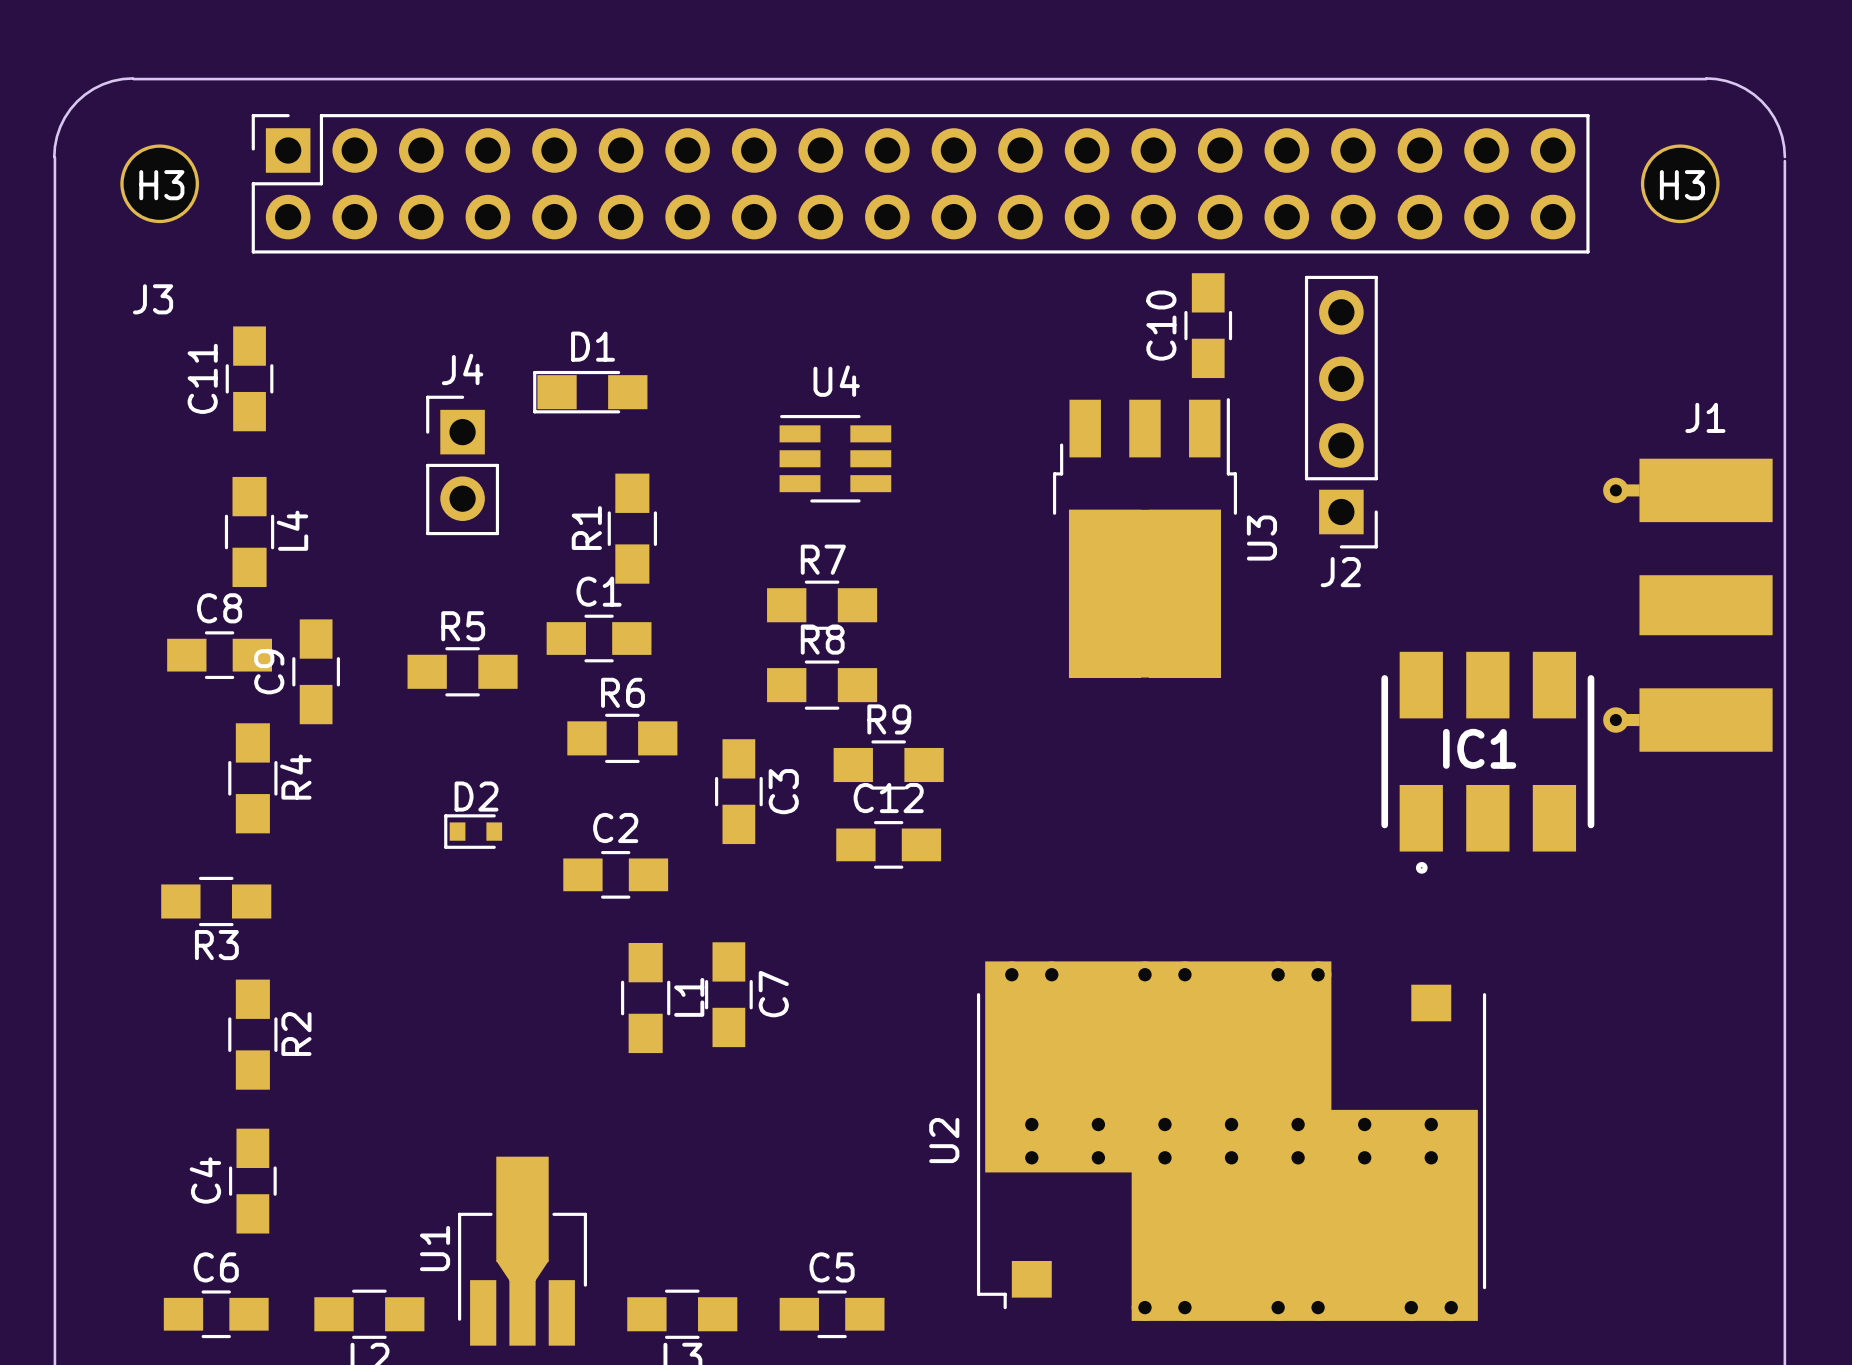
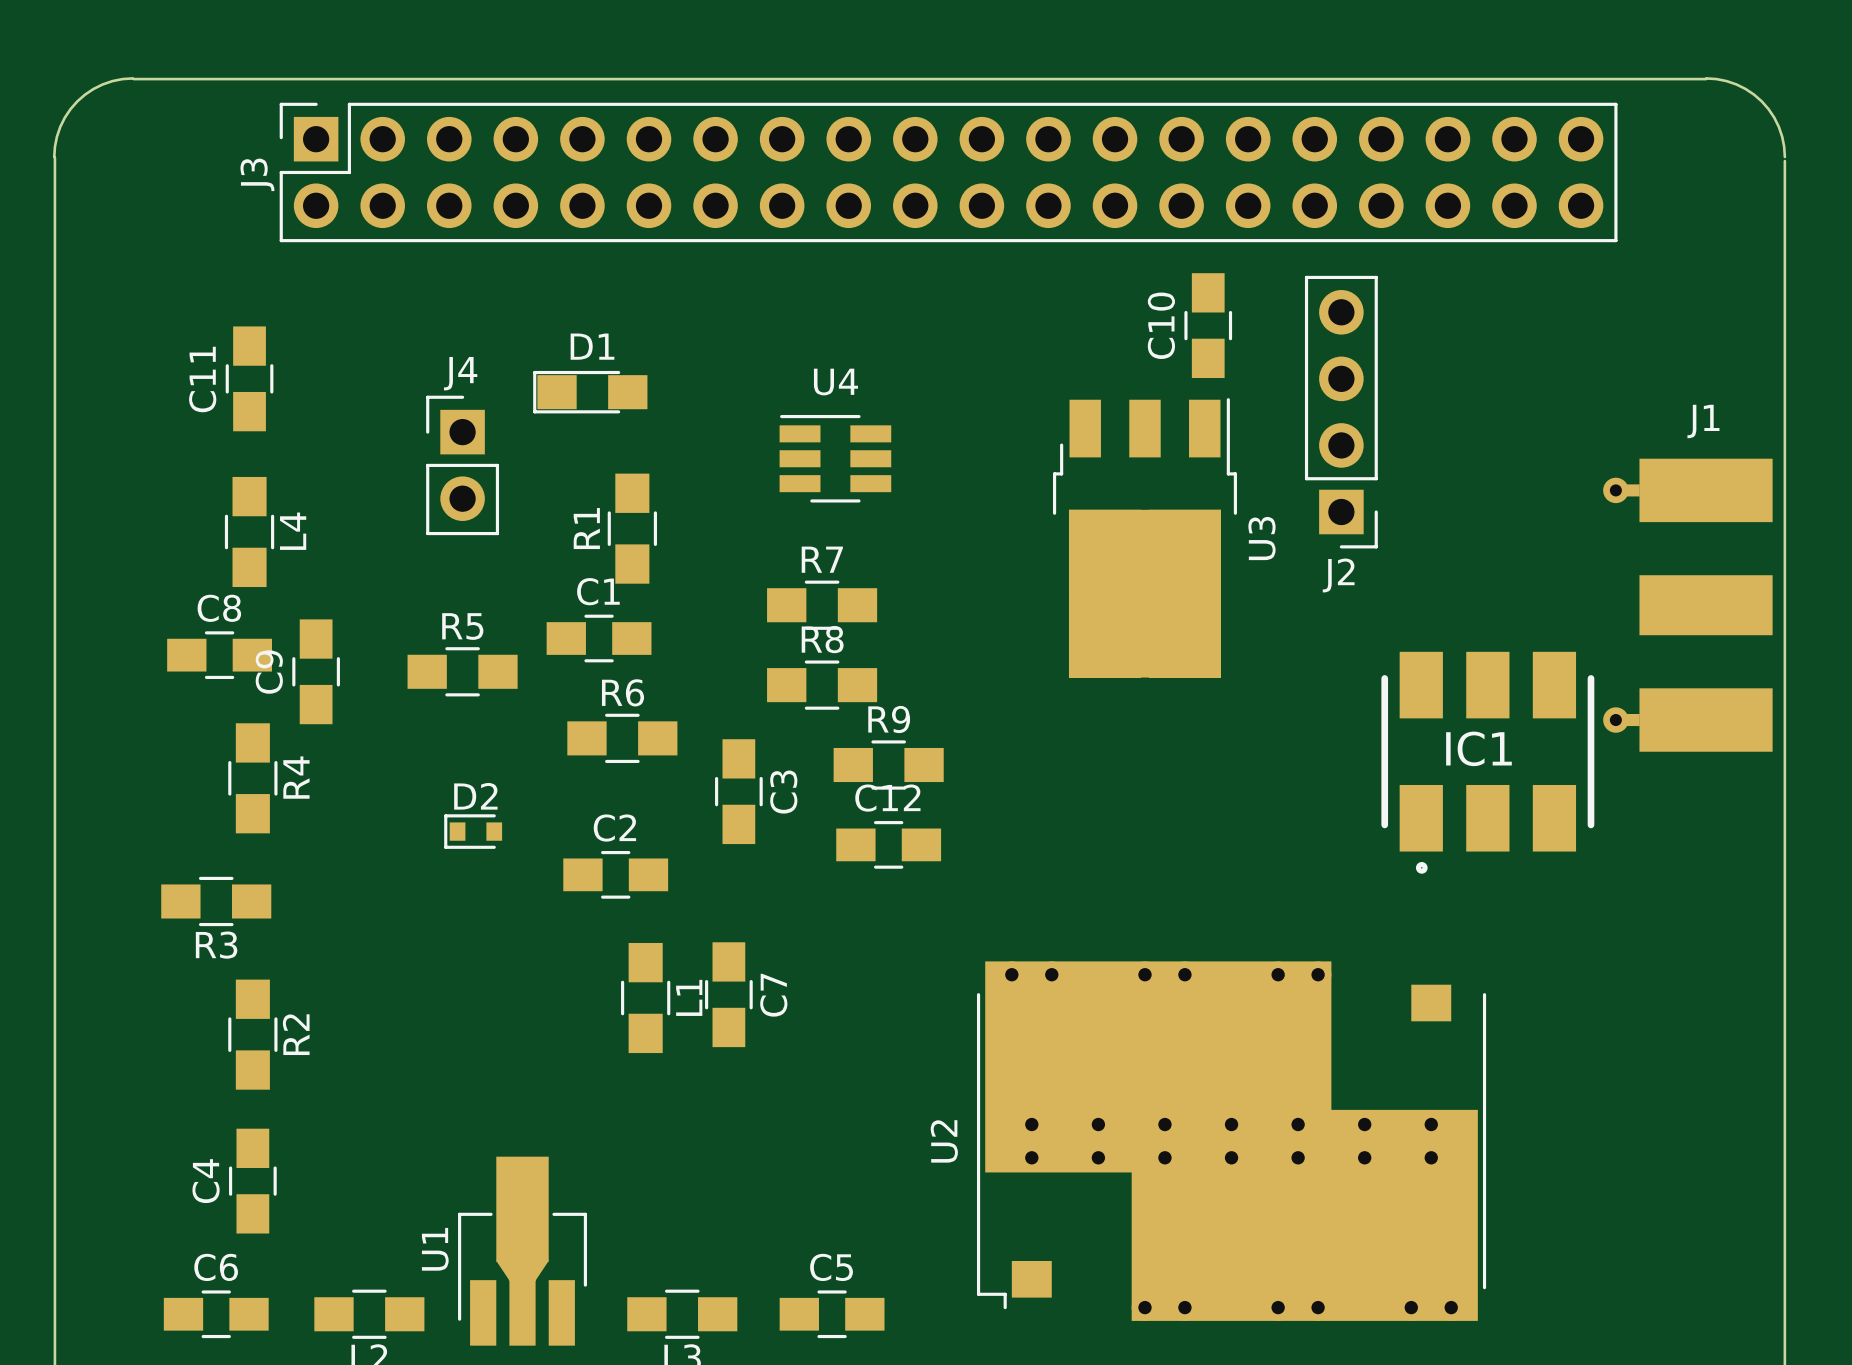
H3: (159, 183) -> none
J3 position: (920, 183) -> (948, 172)
H3: (1680, 183) -> none
J3 name rotation: 0° (153, 299) -> 90° counterclockwise (257, 174)
J3 name position: J3 (153, 299) -> J3 (257, 174)

